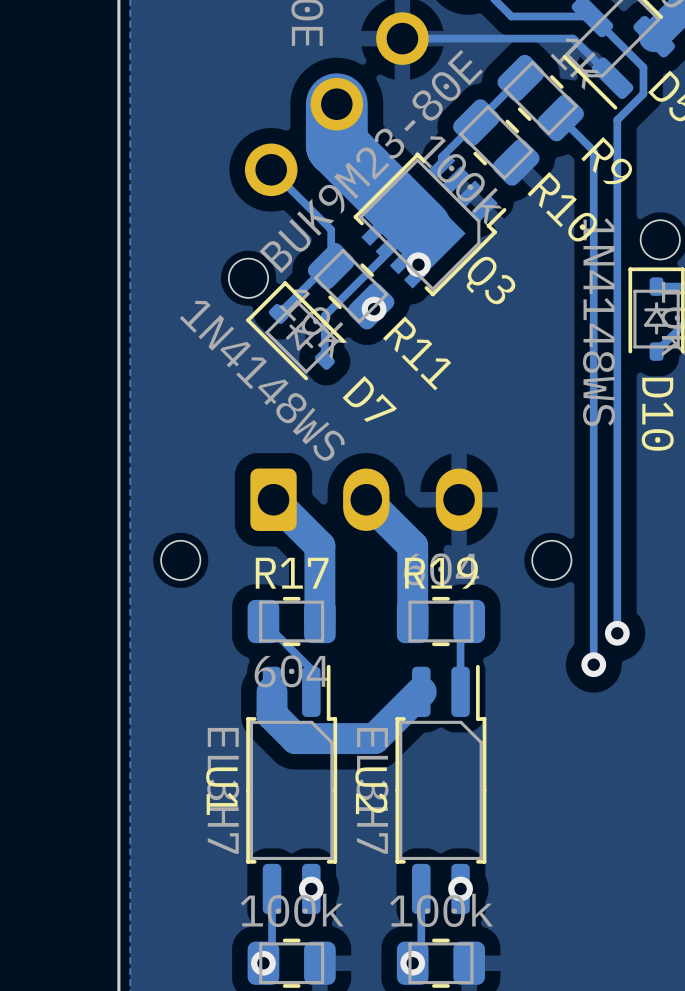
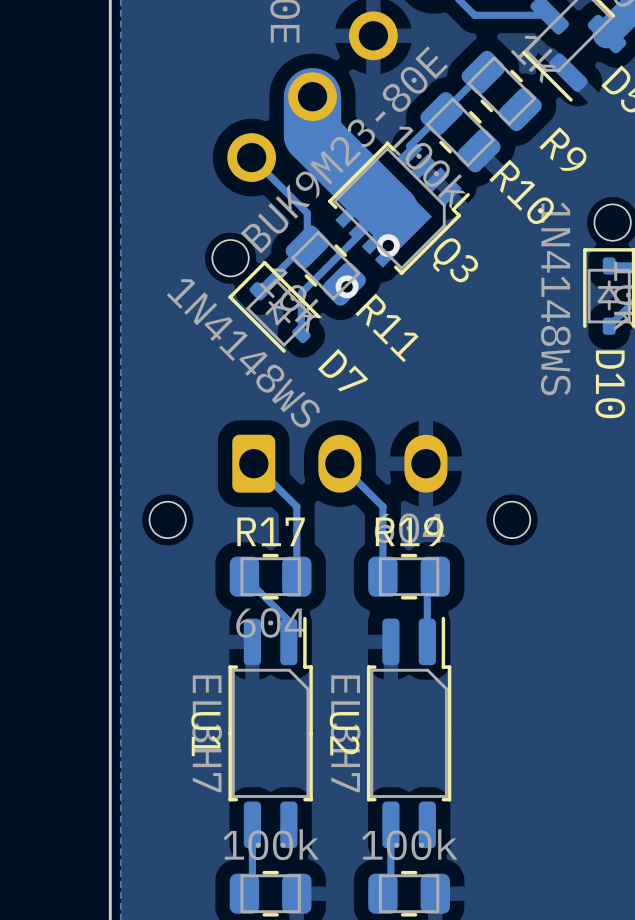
track: (592, 16) (643, 67) (643, 93) (617, 120) (617, 633) -> none
track: (402, 38) (572, 38) (612, 78) -> none
track: (560, 118) (593, 151) (593, 664) -> none
track width: thick (273, 499) (319, 546) (319, 621) -> thin (253, 463) (296, 506) (296, 576)
track width: thick (366, 499) (412, 546) (412, 621) -> thin (339, 463) (382, 506) (382, 576)
via: (617, 633) -> none
via: (593, 664) -> none
track: (421, 691) (374, 738) (295, 738) (272, 714) (272, 691) -> none
via: (311, 888) -> none
via: (460, 888) -> none
via: (263, 963) -> none
via: (412, 963) -> none

